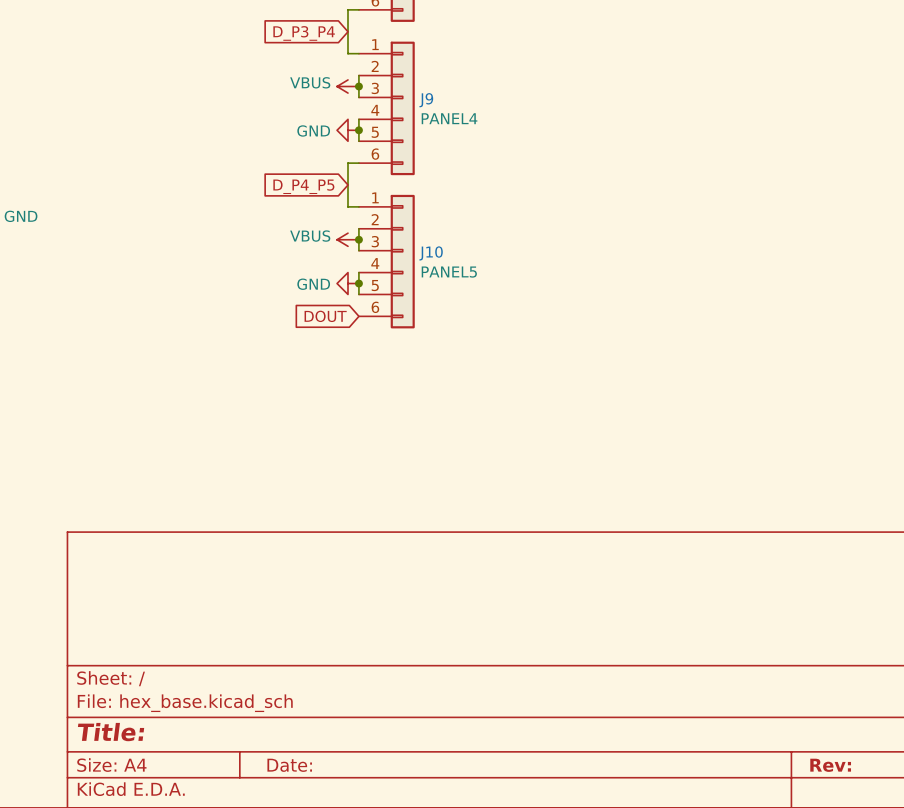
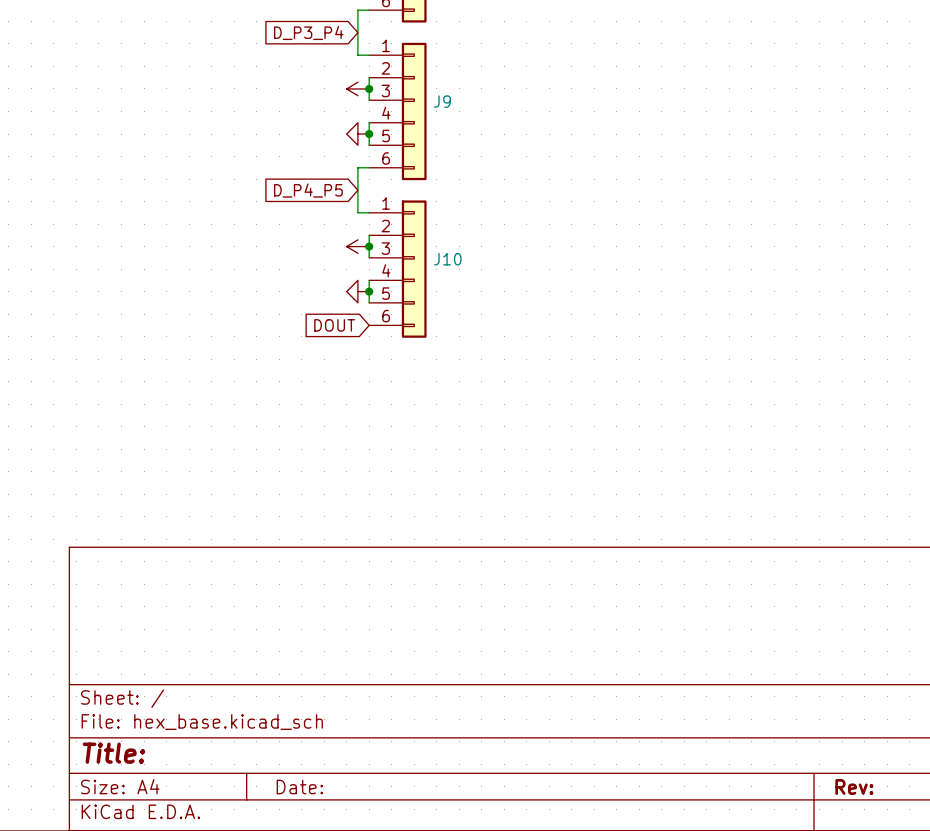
power symbol text: VBUS (310, 82) -> none
J9 value: PANEL4 (449, 118) -> none
power symbol text: GND (313, 130) -> none
power symbol text: GND (21, 216) -> none
power symbol text: VBUS (310, 236) -> none
J10 value: PANEL5 (449, 272) -> none
power symbol text: GND (313, 284) -> none

